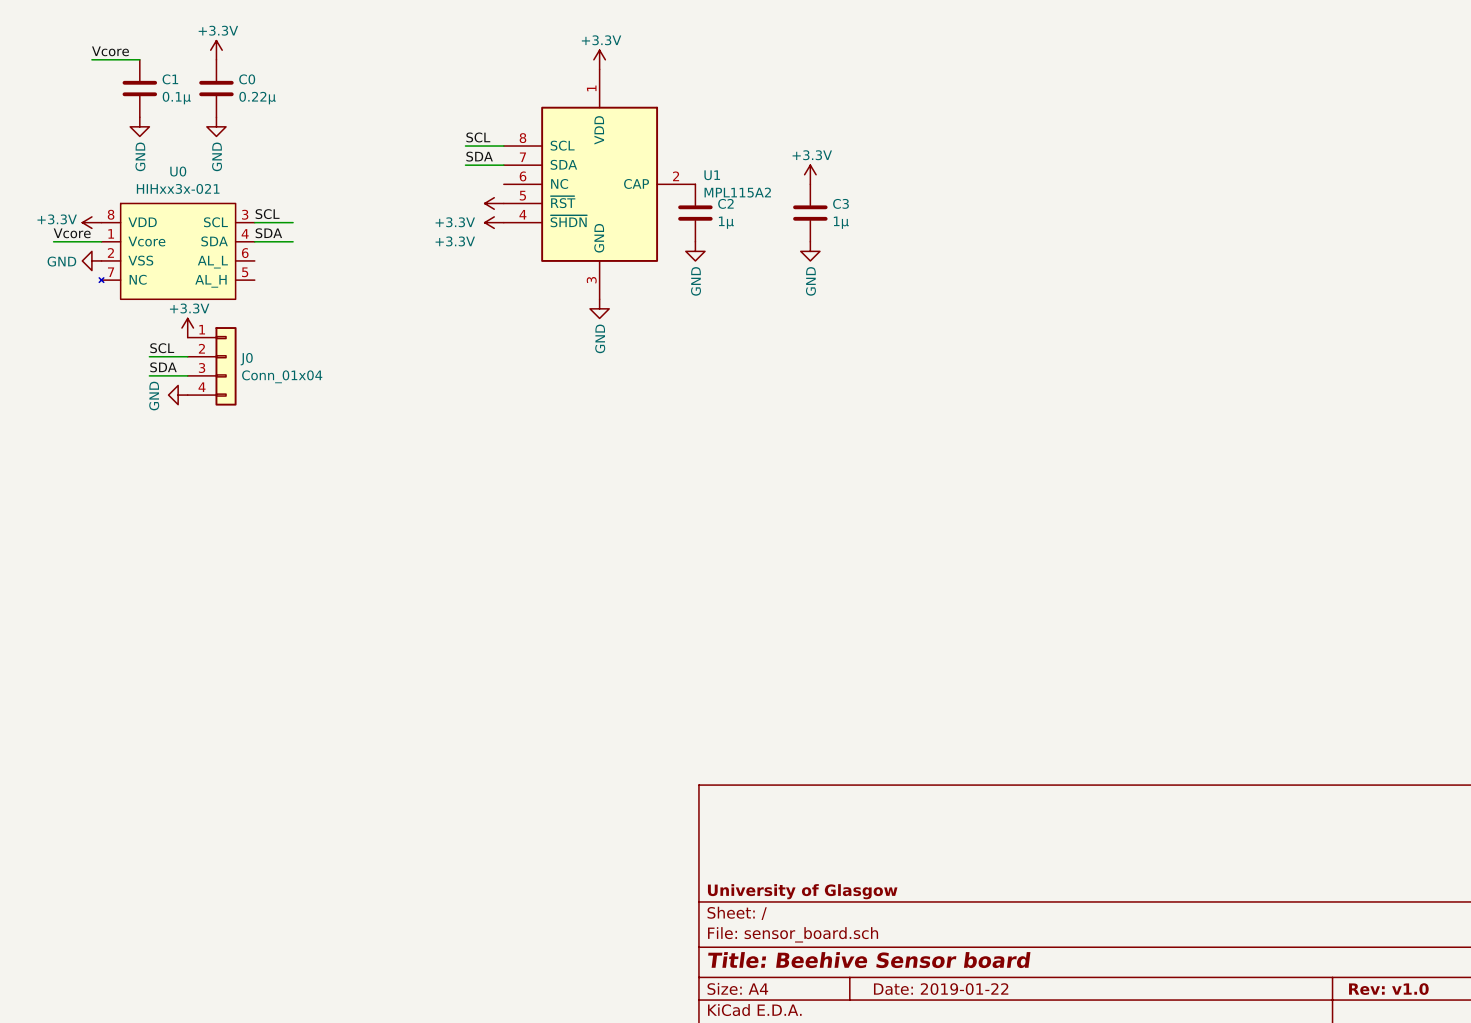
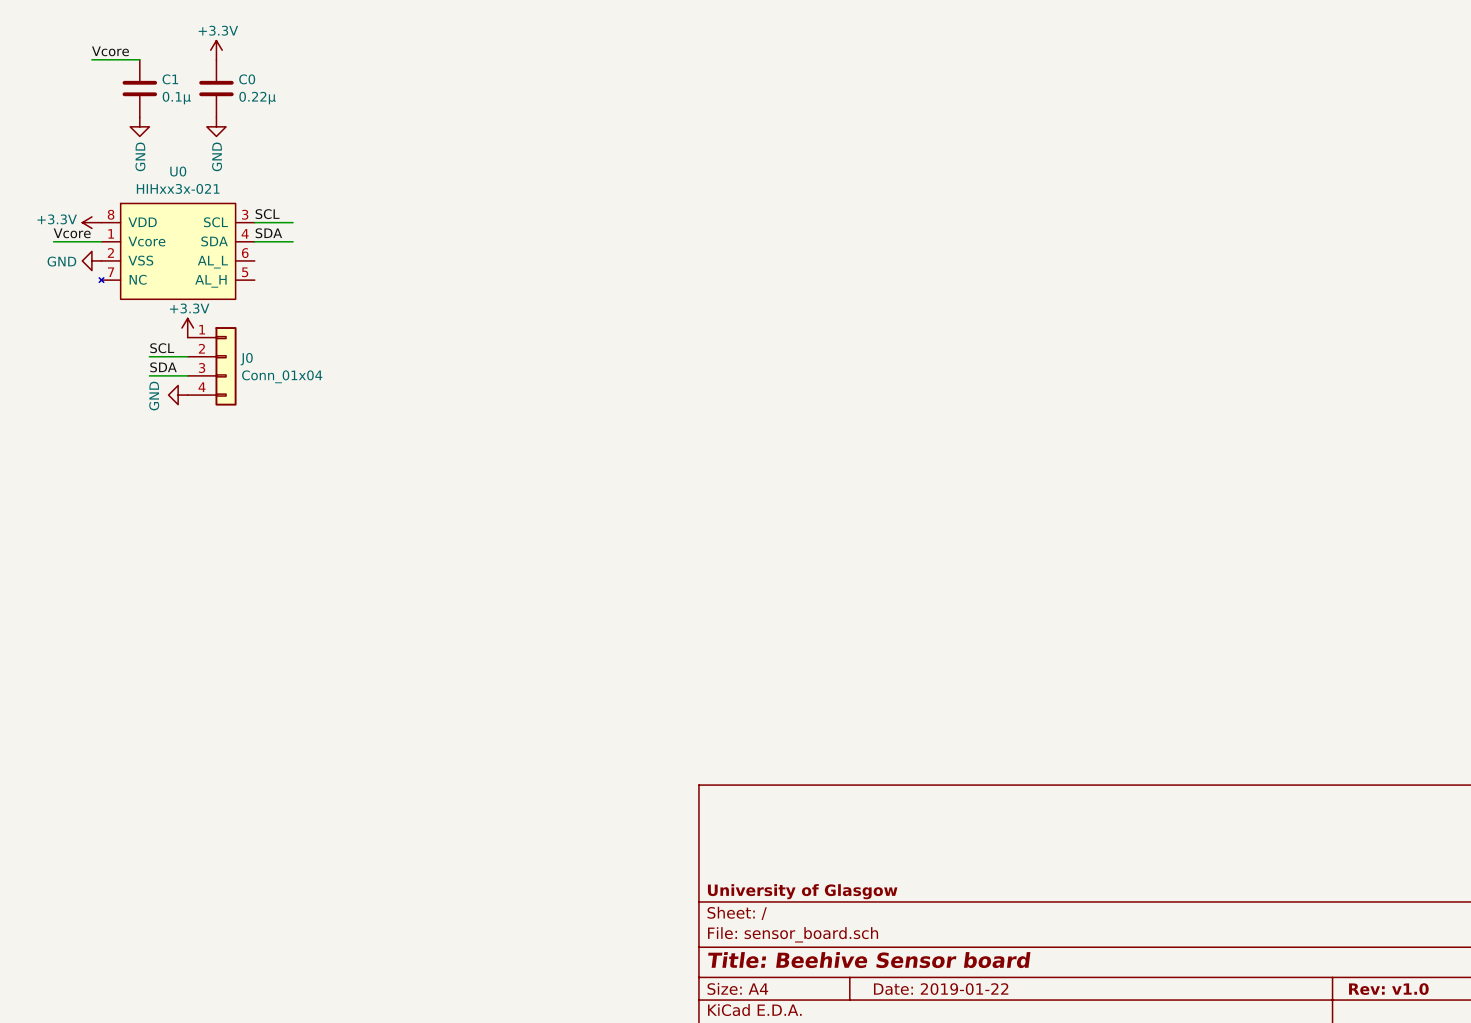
power symbol: +3.3V (599, 59) -> none
label: SCL (478, 137) -> none
wire: (465, 146) (503, 146) -> none
label: SDA (479, 156) -> none
wire: (465, 165) (503, 165) -> none
power symbol: +3.3V (810, 174) -> none
U1: MPL115A2 (599, 184) -> none
power symbol: +3.3V (494, 203) -> none
C2: 1µ (695, 213) -> none
C3: 1µ (810, 213) -> none
power symbol: +3.3V (494, 222) -> none
power symbol: GND (695, 251) -> none
power symbol: GND (810, 251) -> none
power symbol: GND (599, 308) -> none

